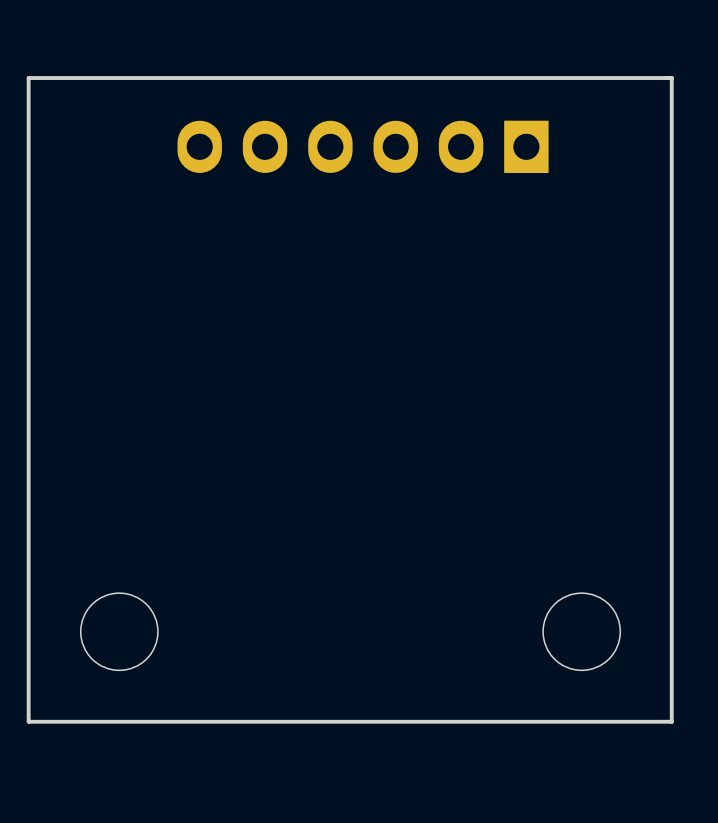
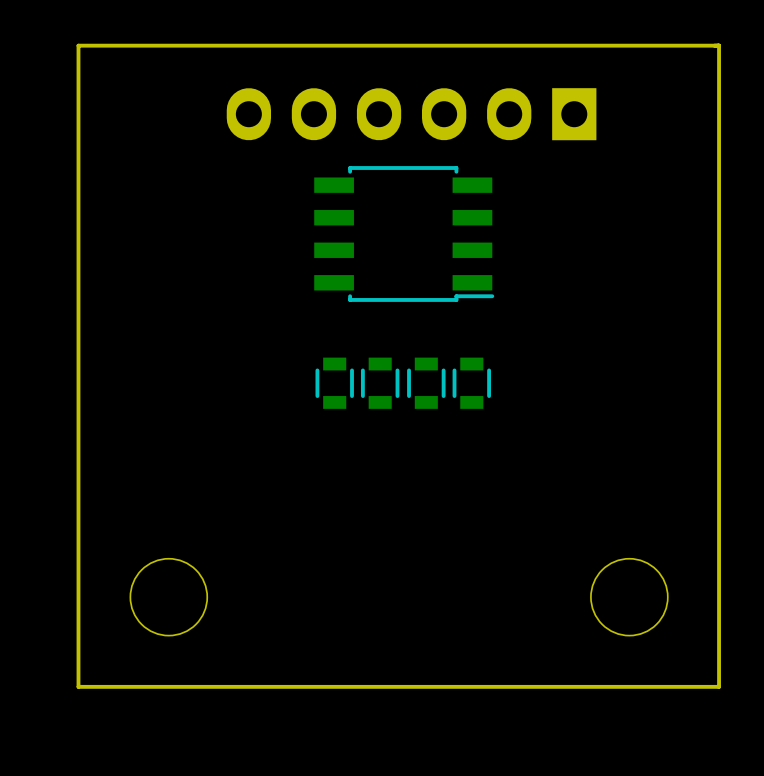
part: none -> (404, 233)
part: none -> (334, 383)
part: none -> (380, 383)
part: none -> (426, 383)
part: none -> (471, 383)

